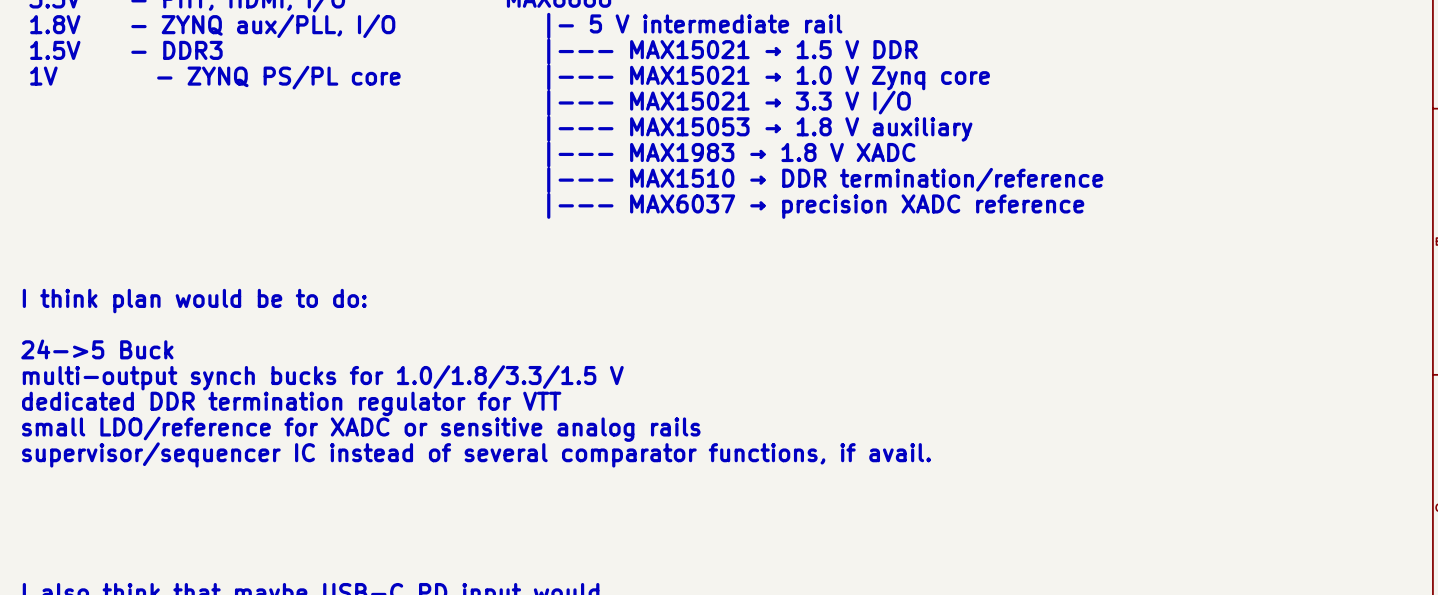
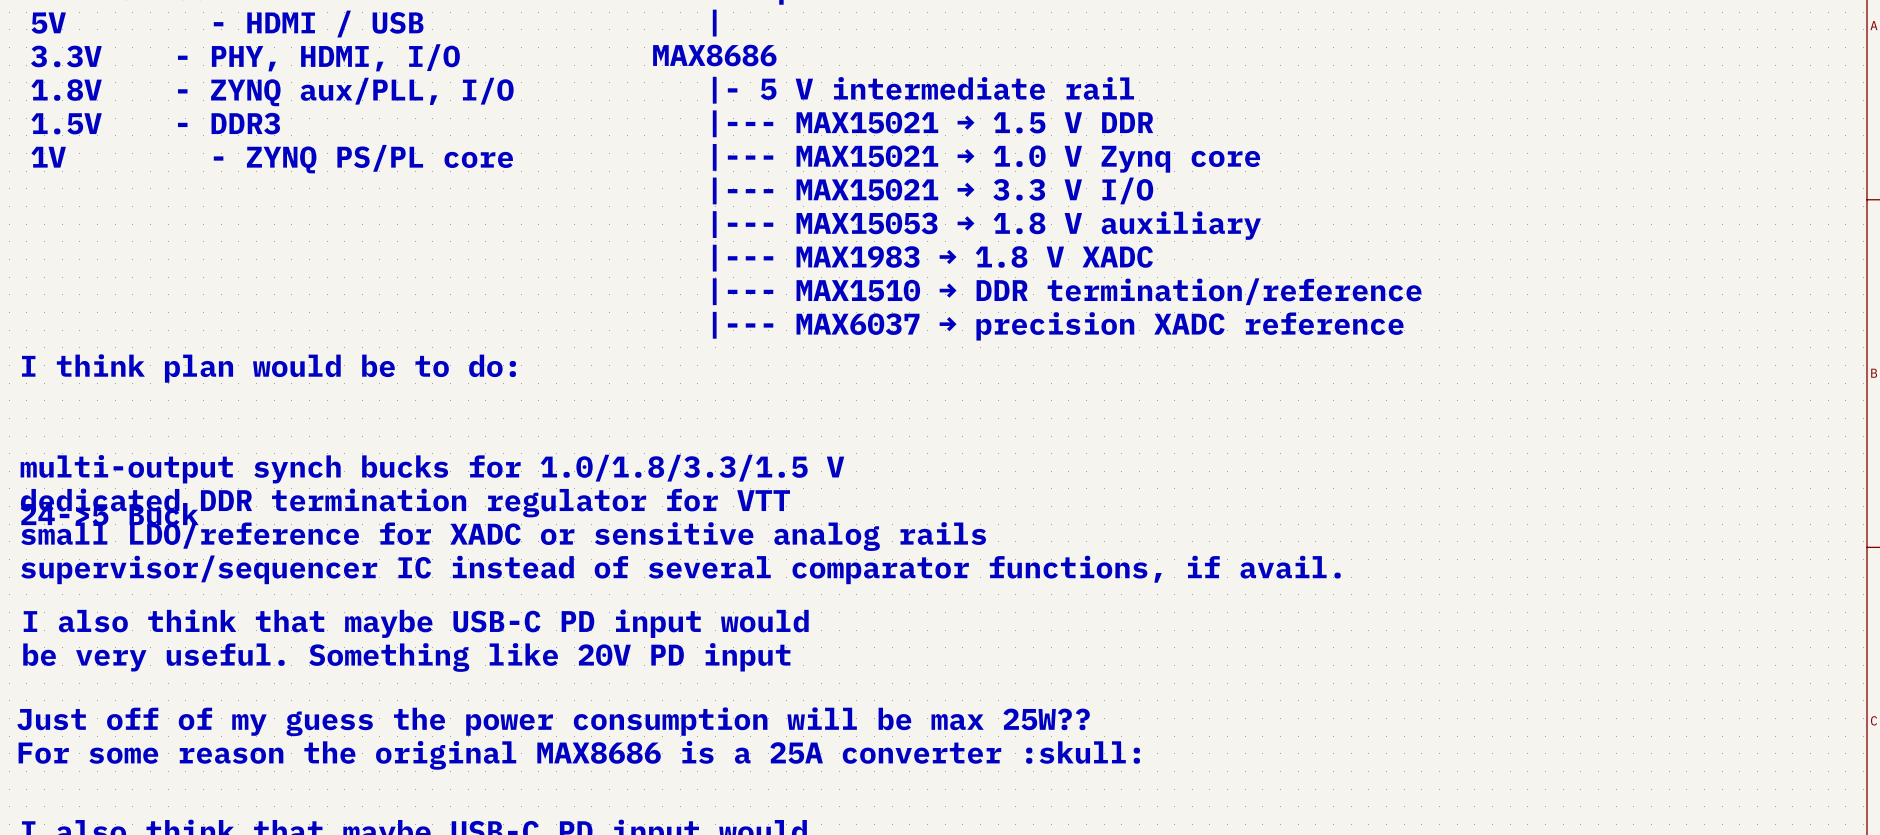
text position: I think plan would be to do: (194, 301) -> I think plan would be to do: (268, 368)
text position: multi-output synch bucks for 1.0/1.8/3.3/1.5 V (323, 377) -> multi-output synch bucks for 1.0/1.8/3.3/1.5 V (432, 469)
text position: dedicated DDR termination regulator for VTT (291, 403) -> dedicated DDR termination regulator for VTT (405, 502)
text position: small LDO/reference for XADC or sensitive analog rails (361, 429) -> small LDO/reference for XADC or sensitive analog rails (503, 536)
text: none -> I also think that maybe USB-C PD input would (416, 623)
text position: supervisor/sequencer IC instead of several comparator functions, if avail. (476, 454) -> supervisor/sequencer IC instead of several comparator functions, if avail. (680, 569)
text: none -> be very useful. Something like 20V PD input (406, 657)
text: none -> Just off of my guess the power consumption will be max 25W?? (553, 721)
text: none -> For some reason the original MAX8686 is a 25A converter :skull: (579, 755)

